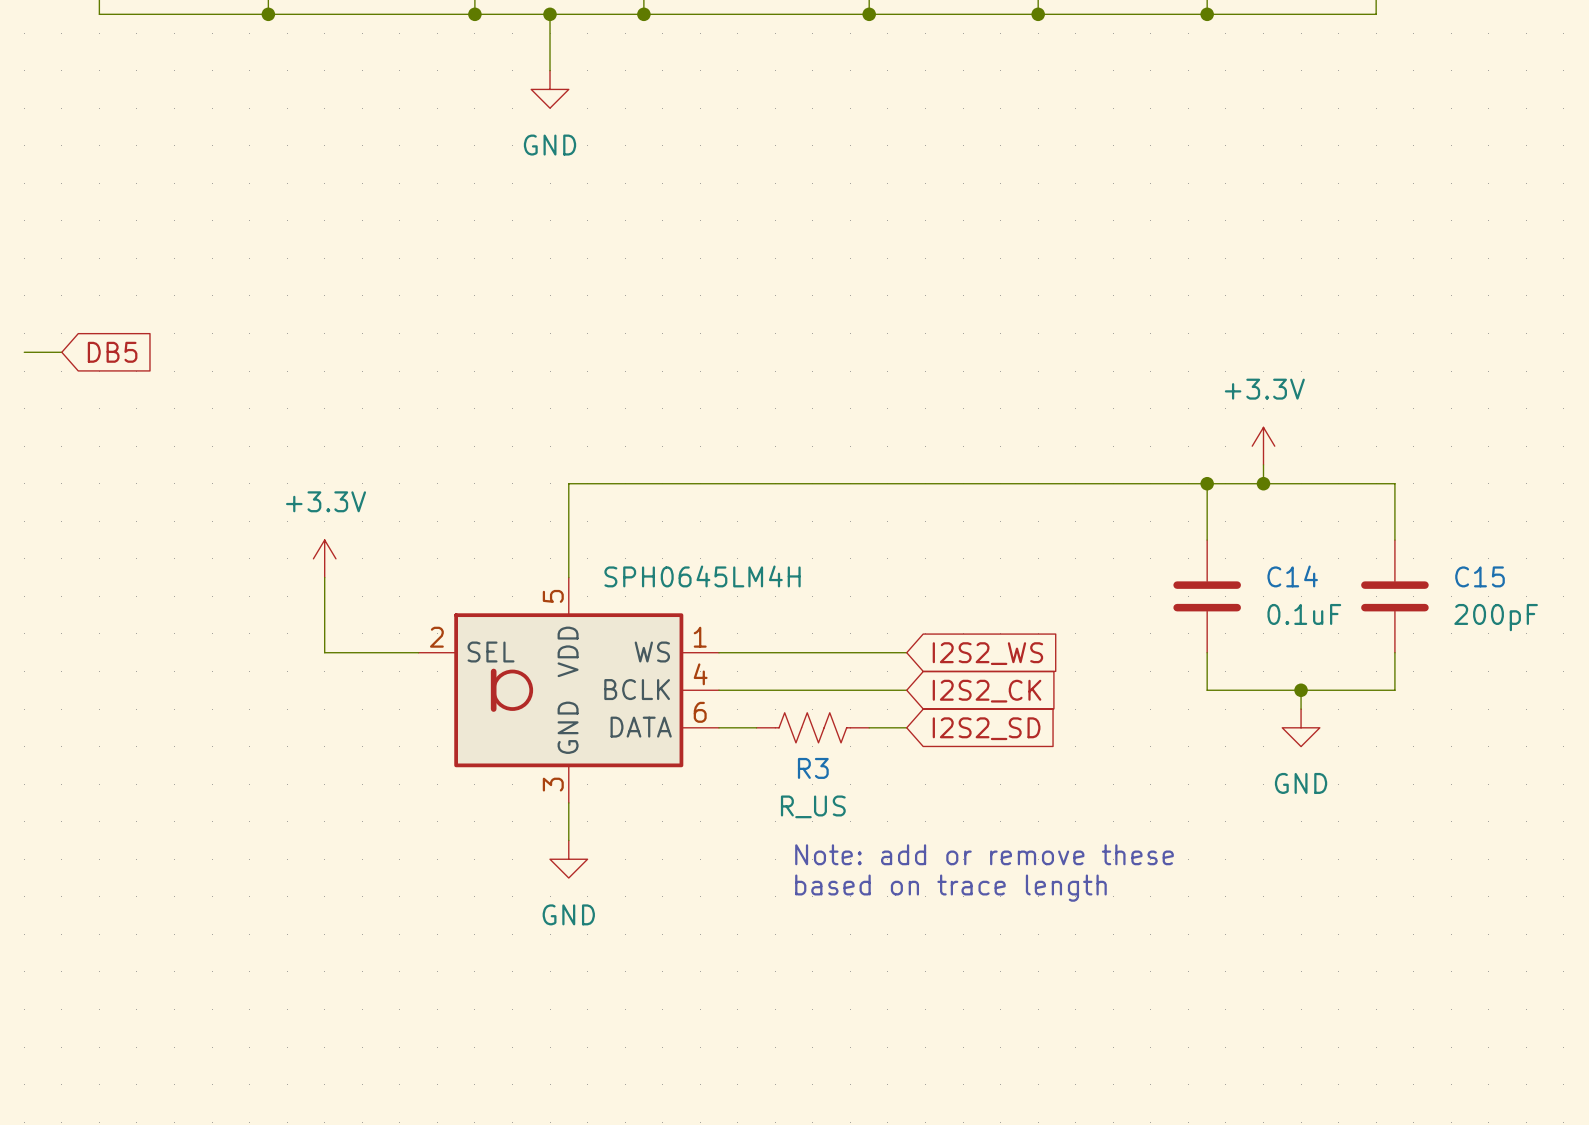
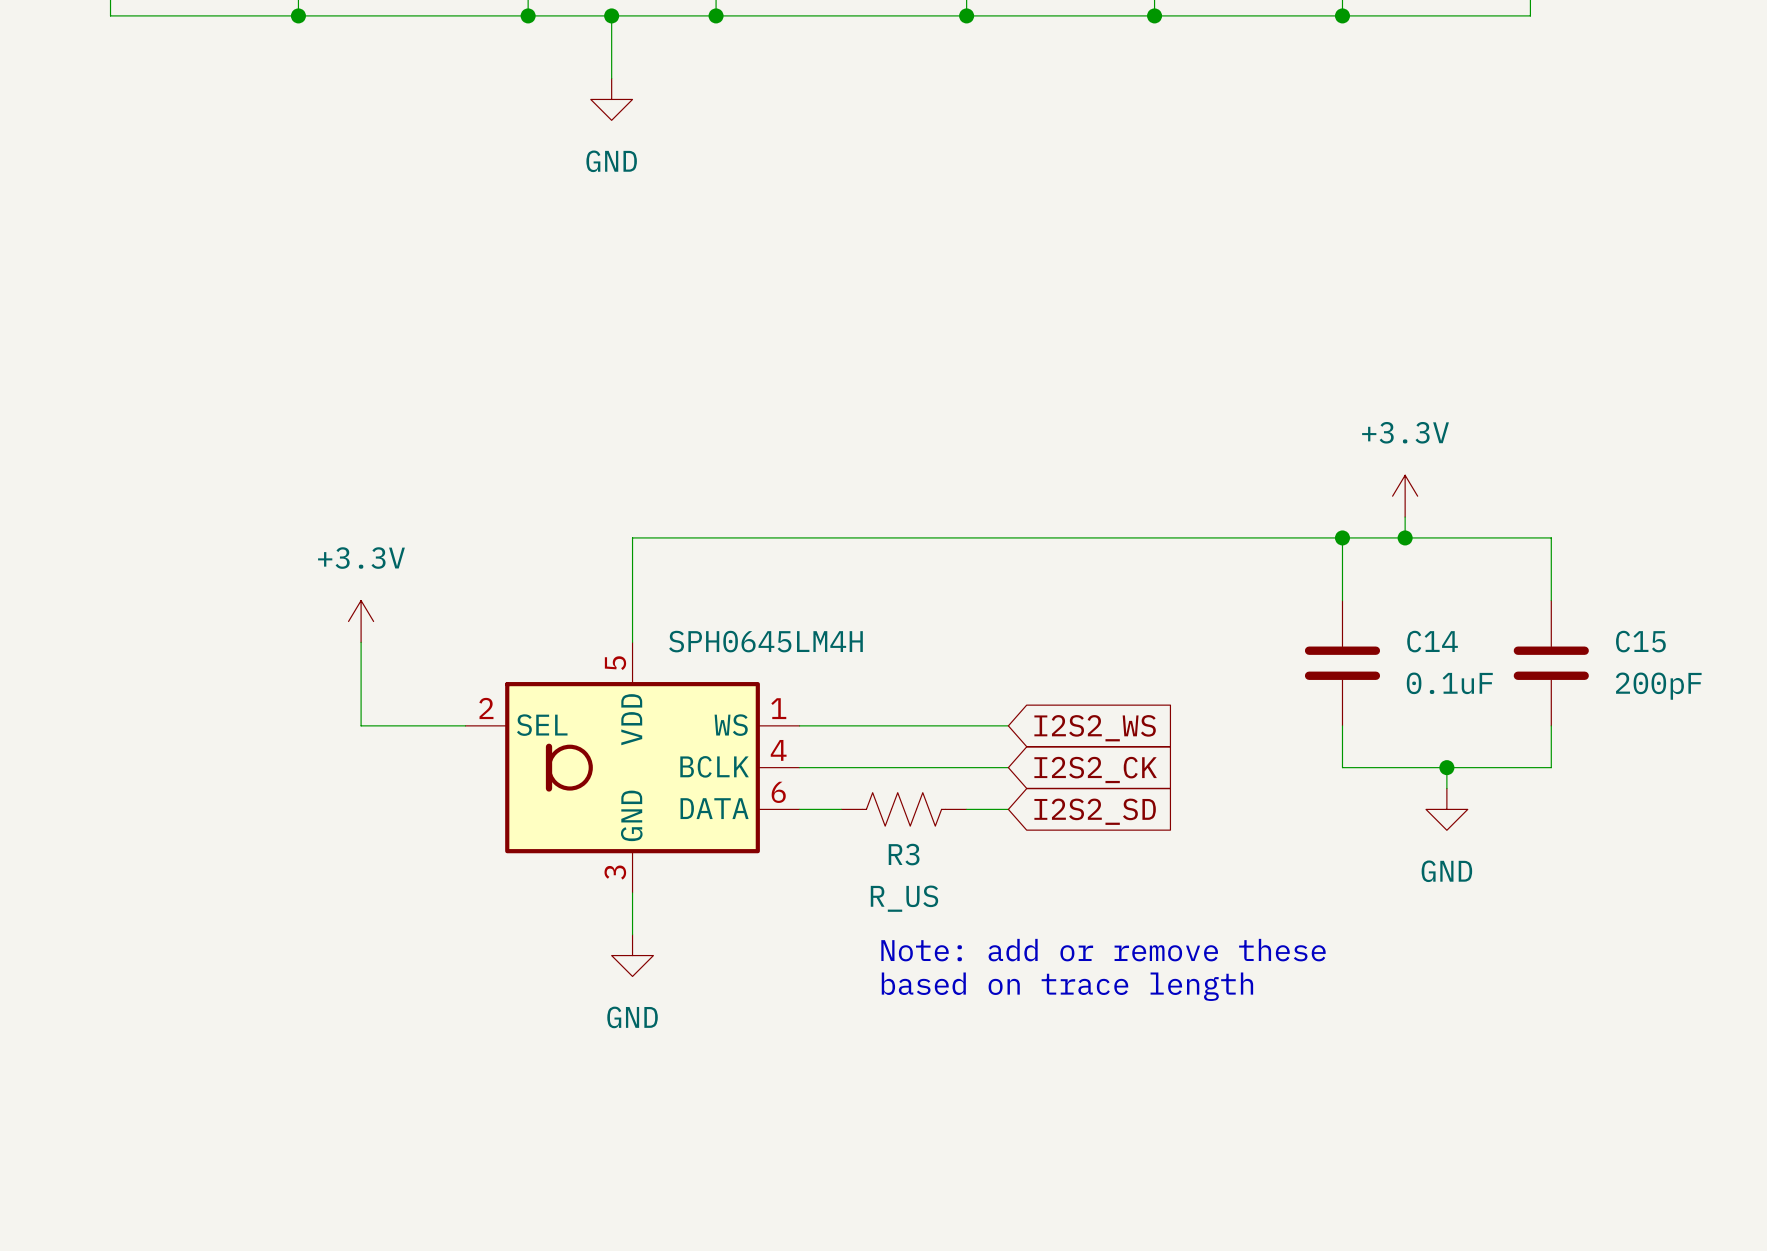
wire: (24, 352) (61, 352) -> none
global label: DB5 (112, 352) -> none

